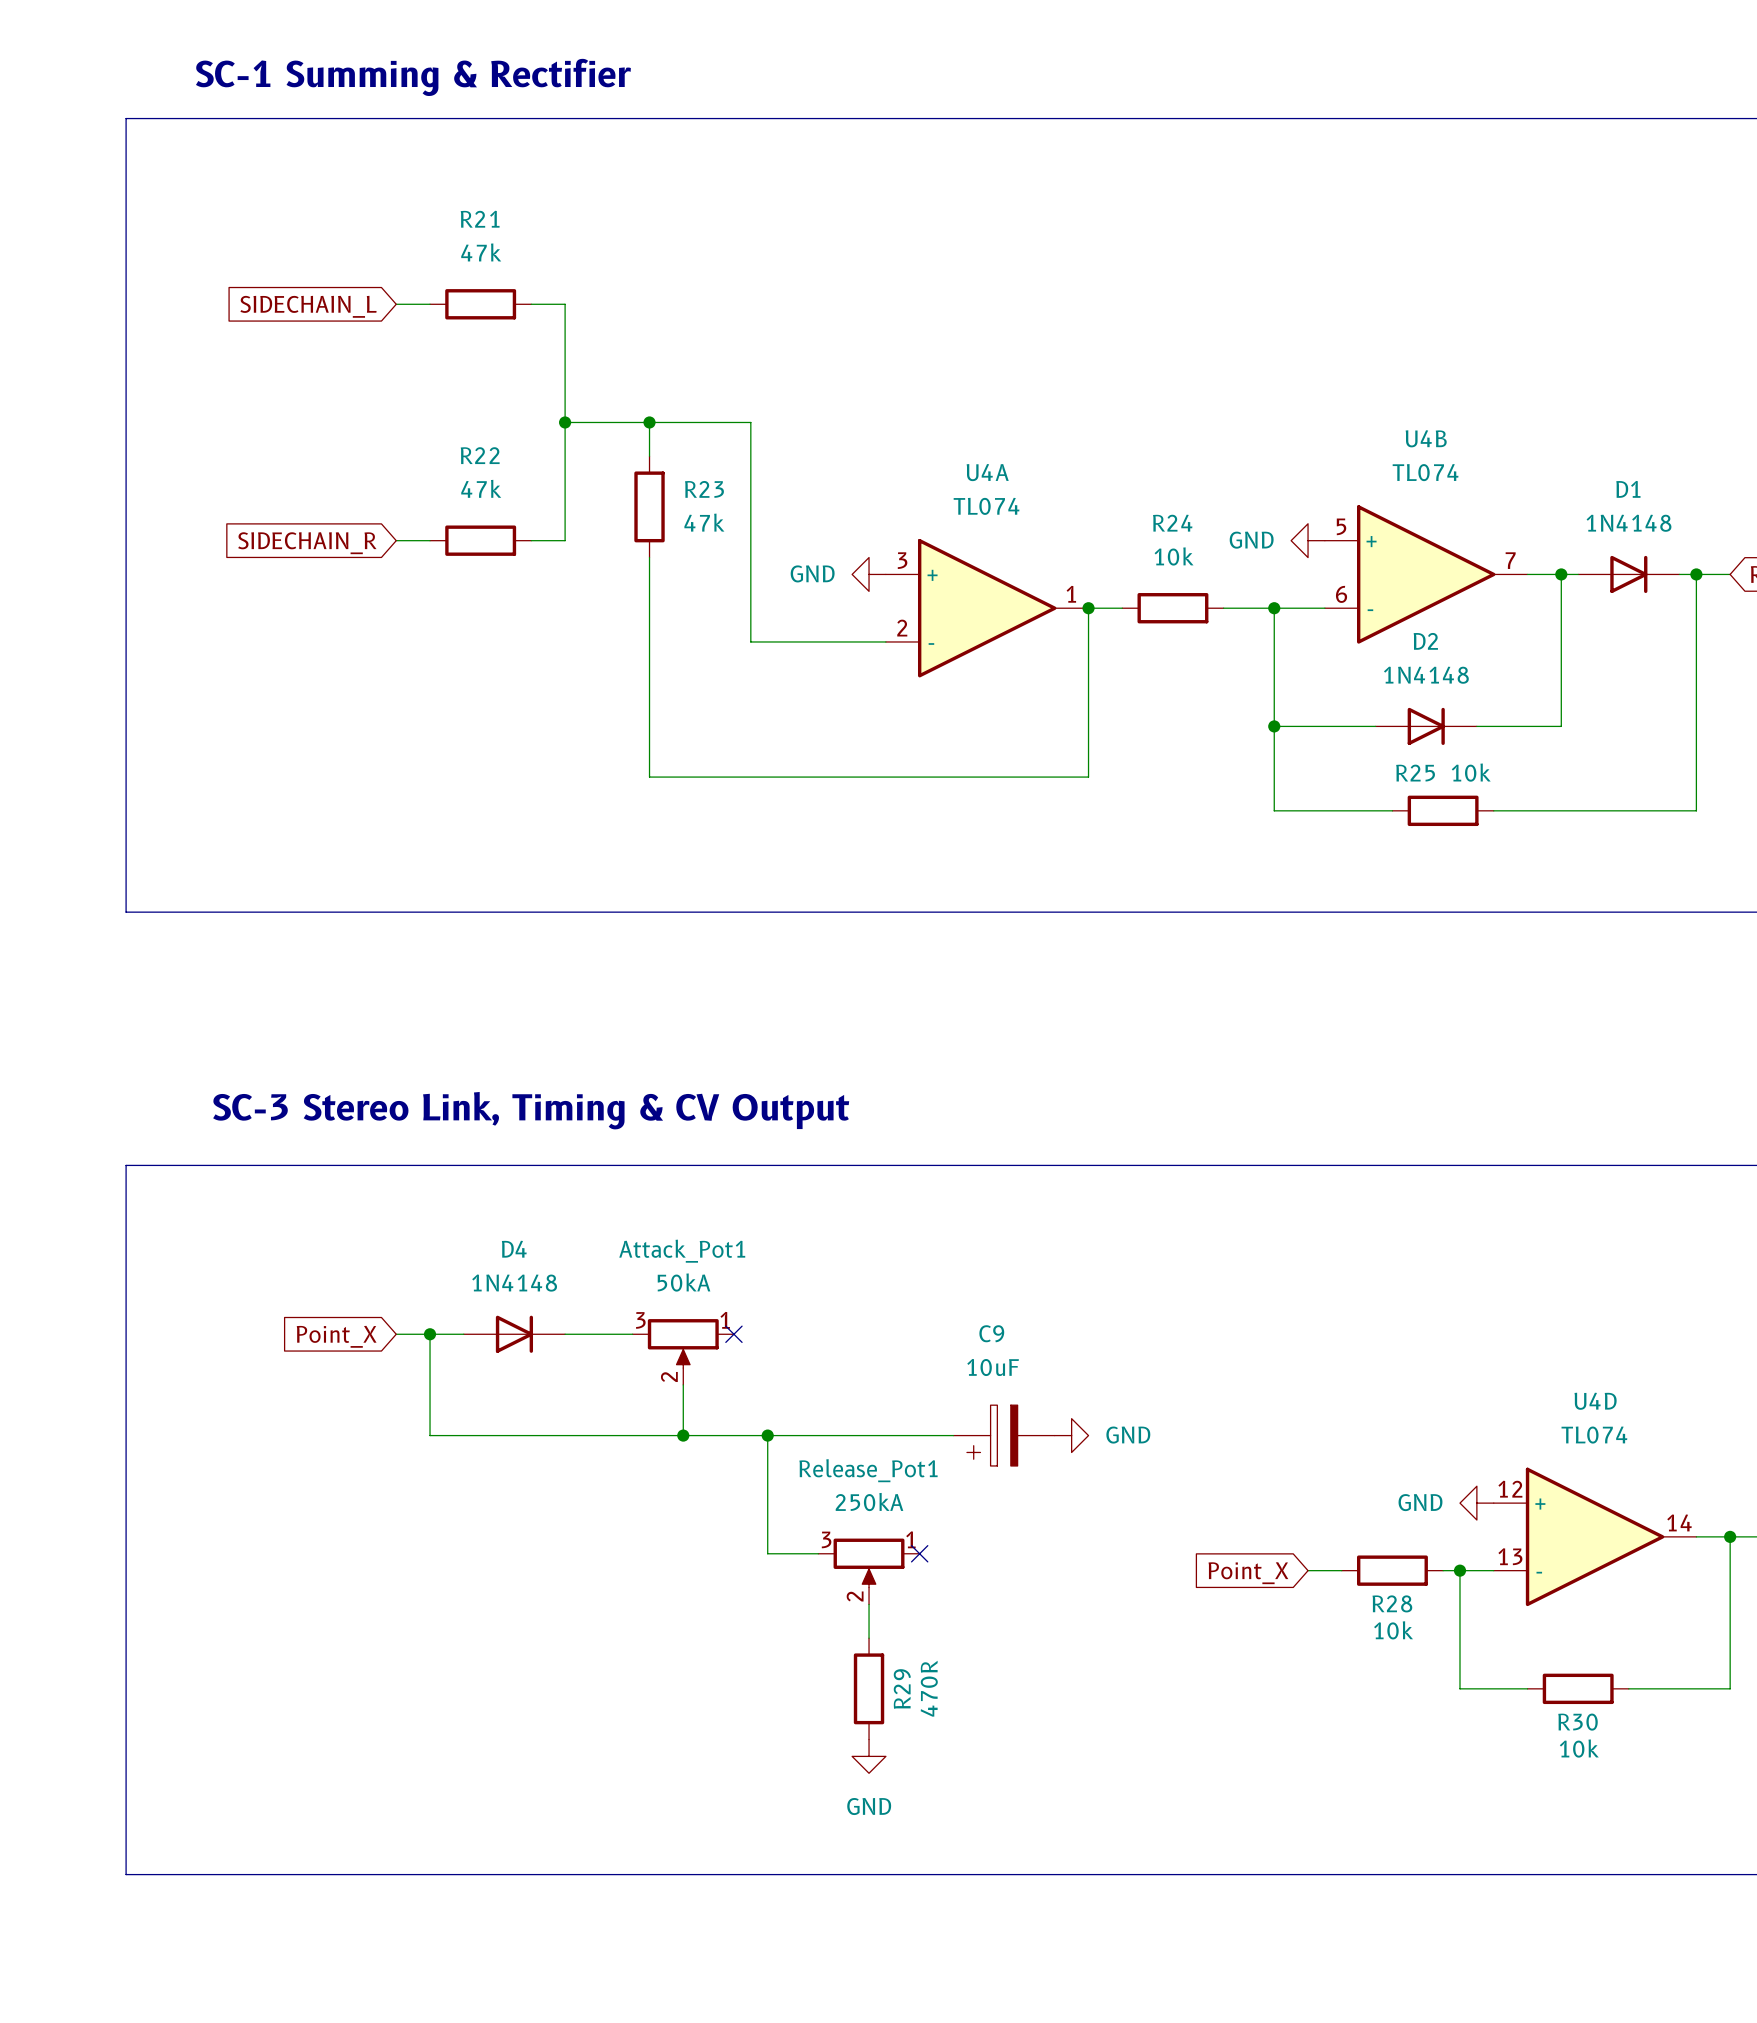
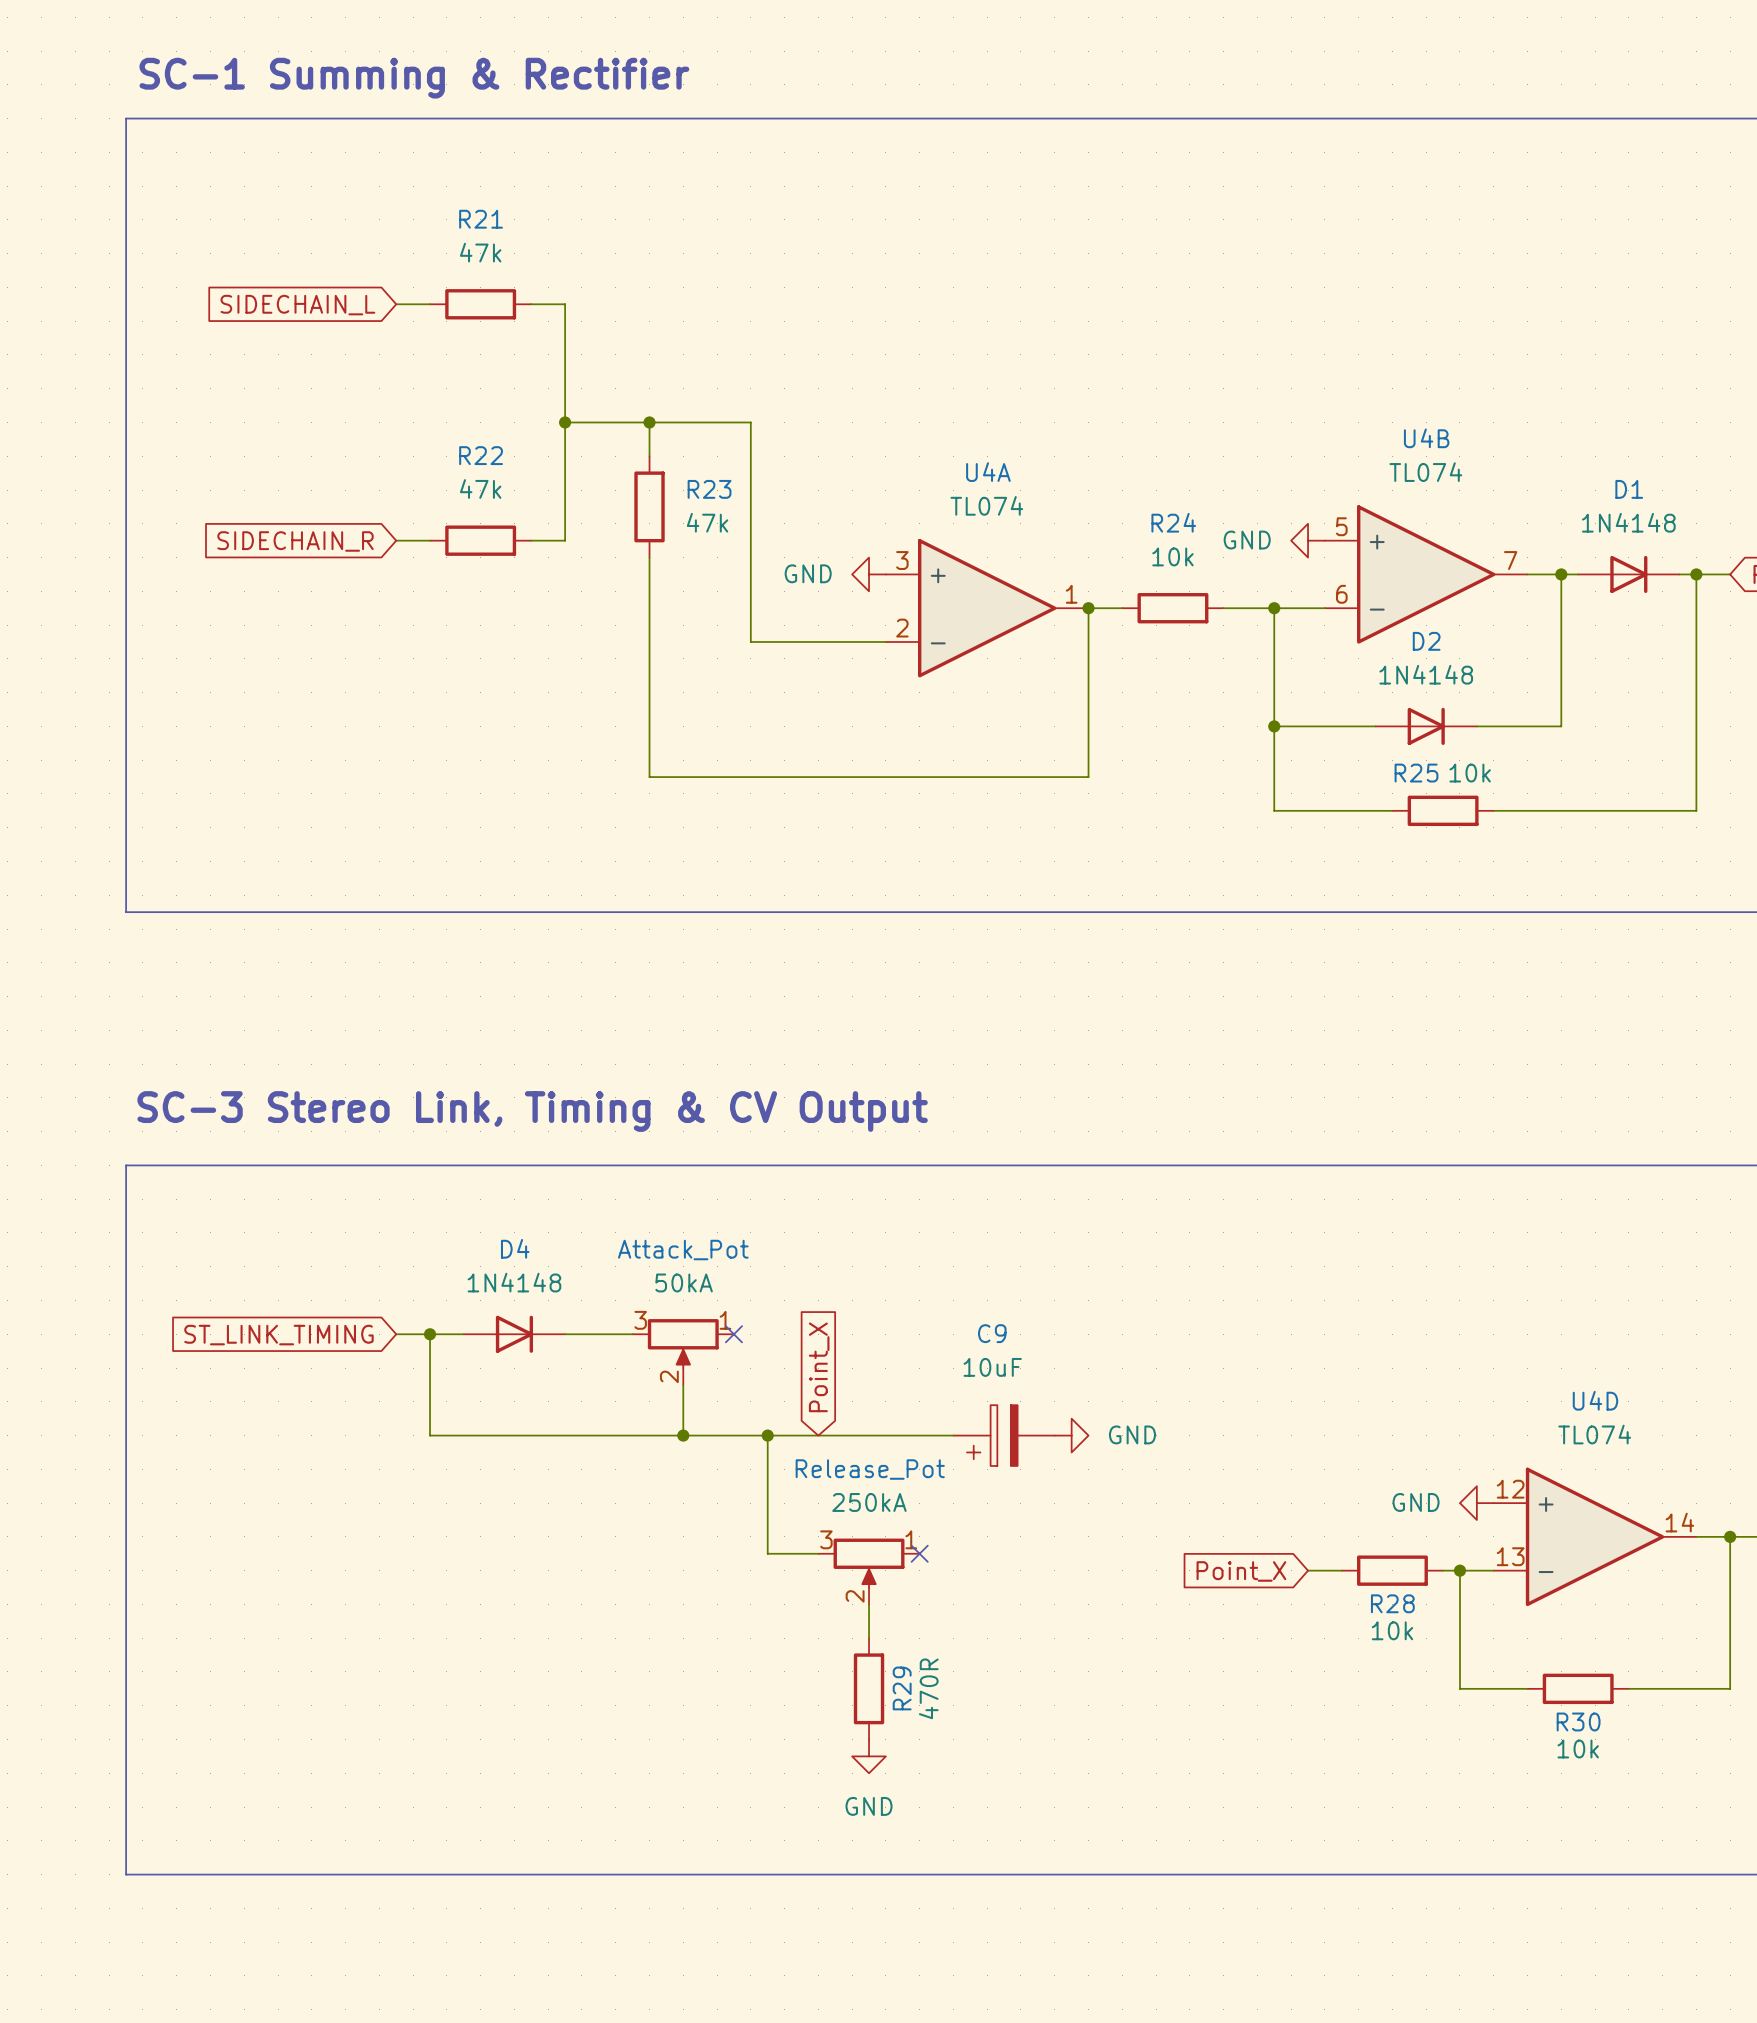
Attack_Pot1 name: Attack_Pot1 (682, 1251) -> Attack_Pot (683, 1250)
global label: Point_X (336, 1336) -> ST_LINK_TIMING (278, 1335)
global label: none -> Point_X (819, 1367)
Release_Pot1 name: Release_Pot1 (868, 1470) -> Release_Pot (870, 1469)

